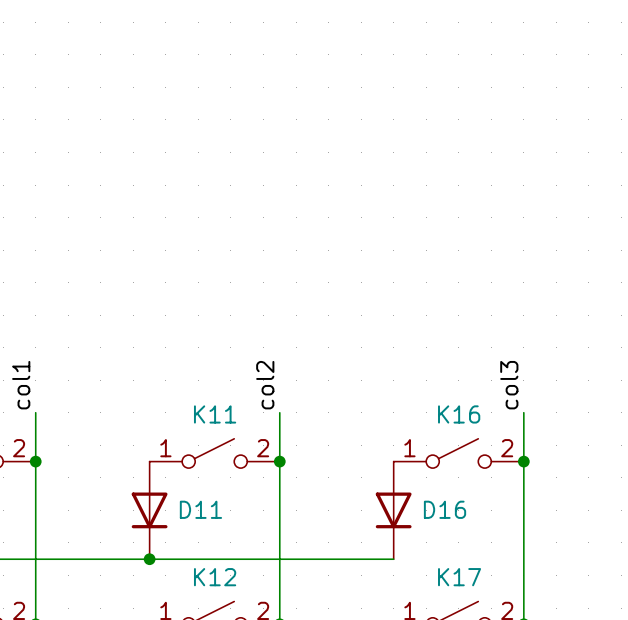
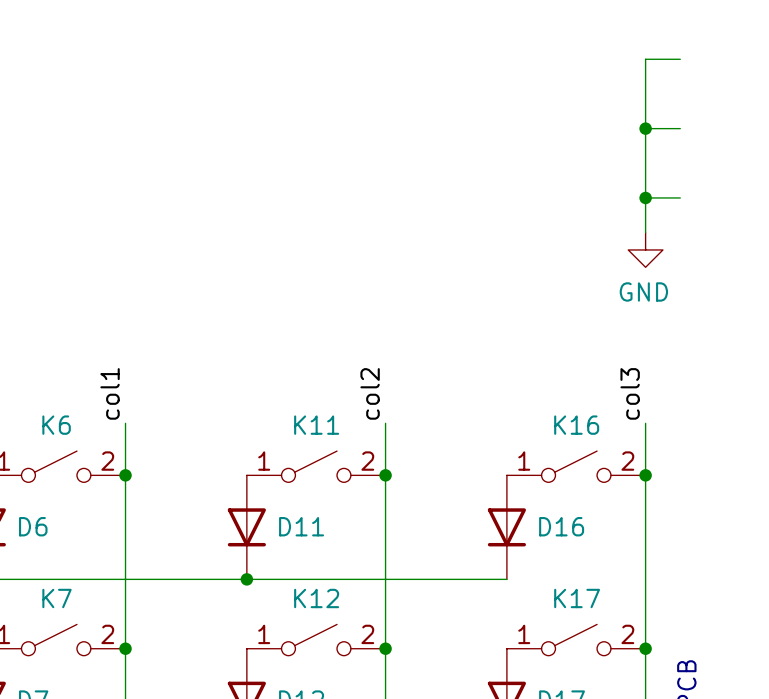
wire: none -> (680, 59) (645, 59) (645, 232)
wire: none -> (645, 128) (680, 128)
junction: none -> (645, 128)
wire: none -> (645, 197) (680, 197)
junction: none -> (645, 197)
power symbol: none -> GND (645, 249)

